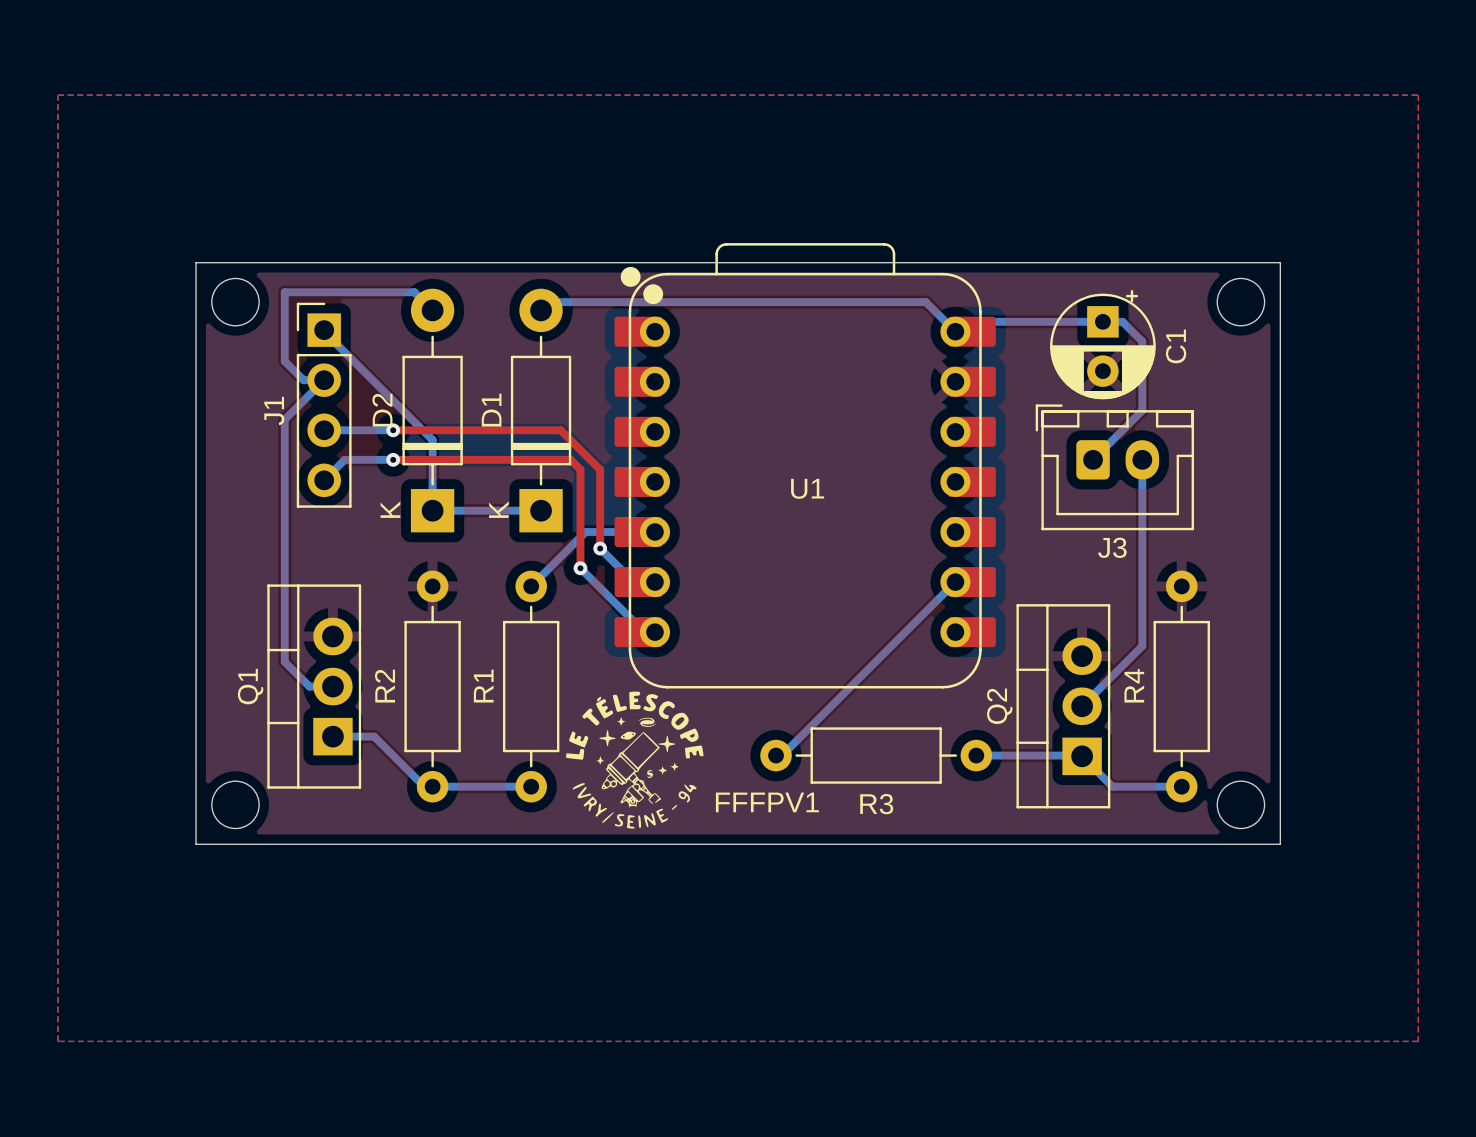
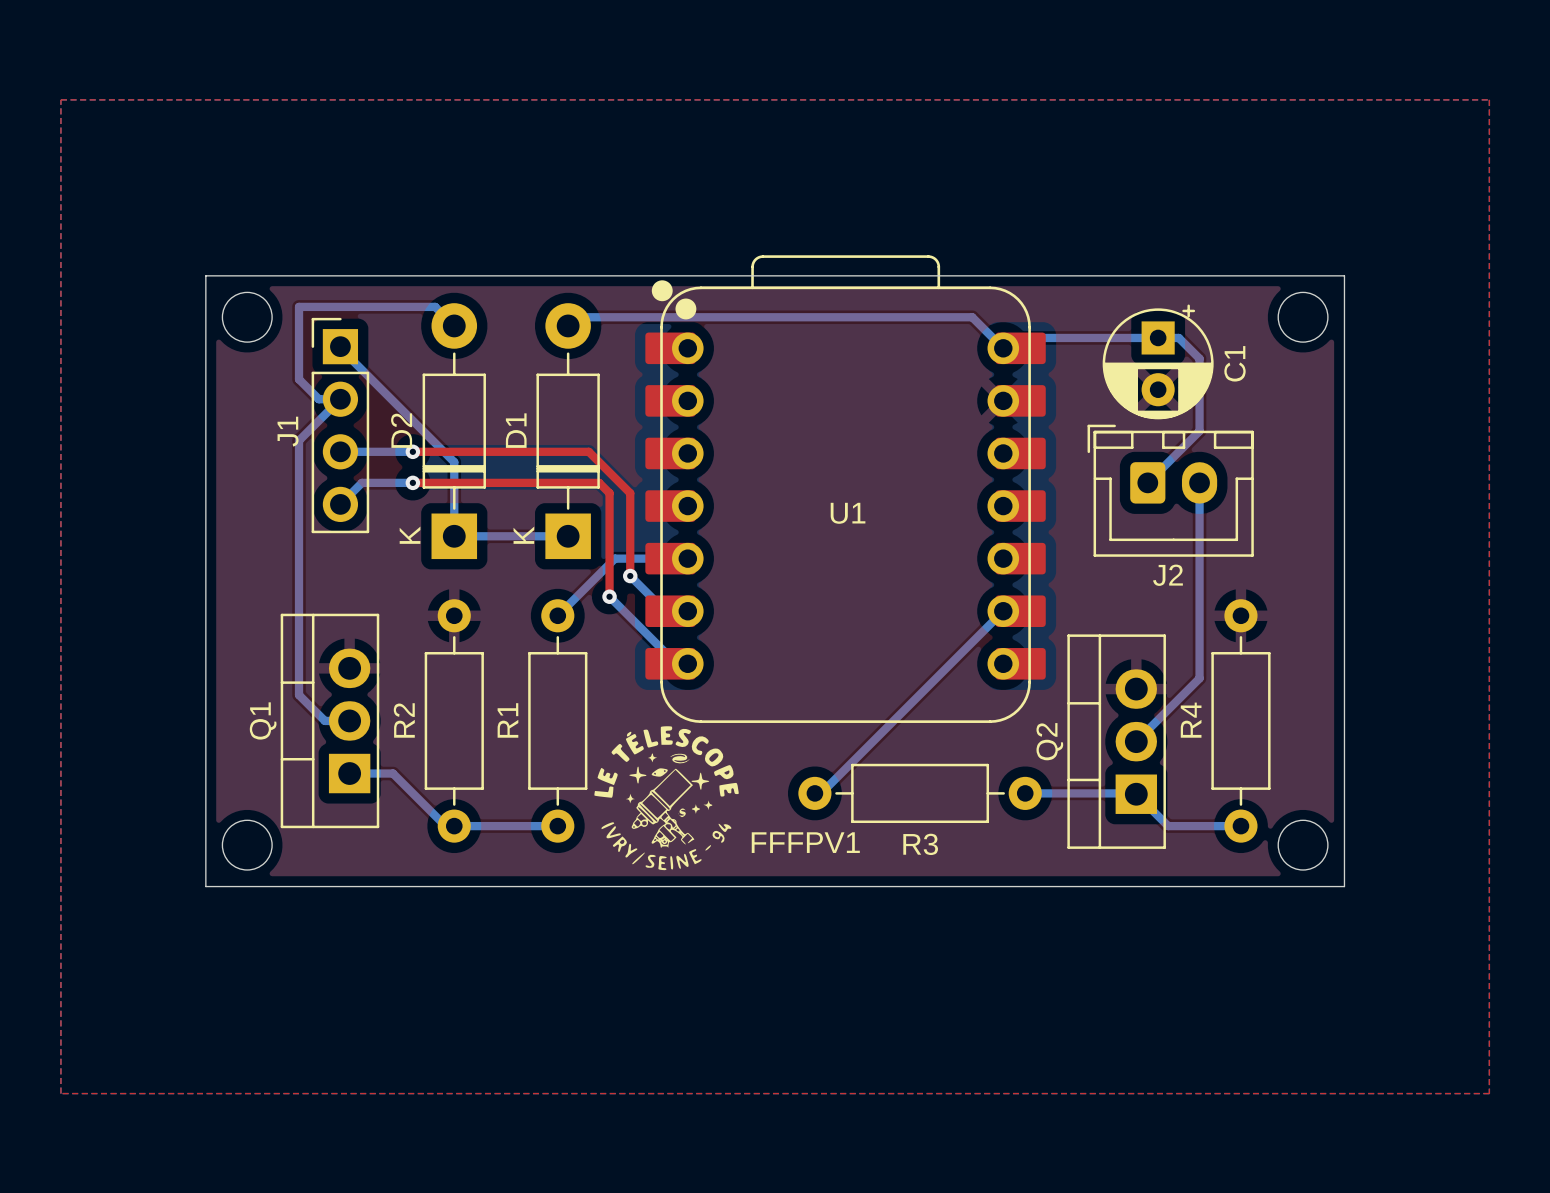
J3 name: J3 (1112, 547) -> J2 (1167, 575)

